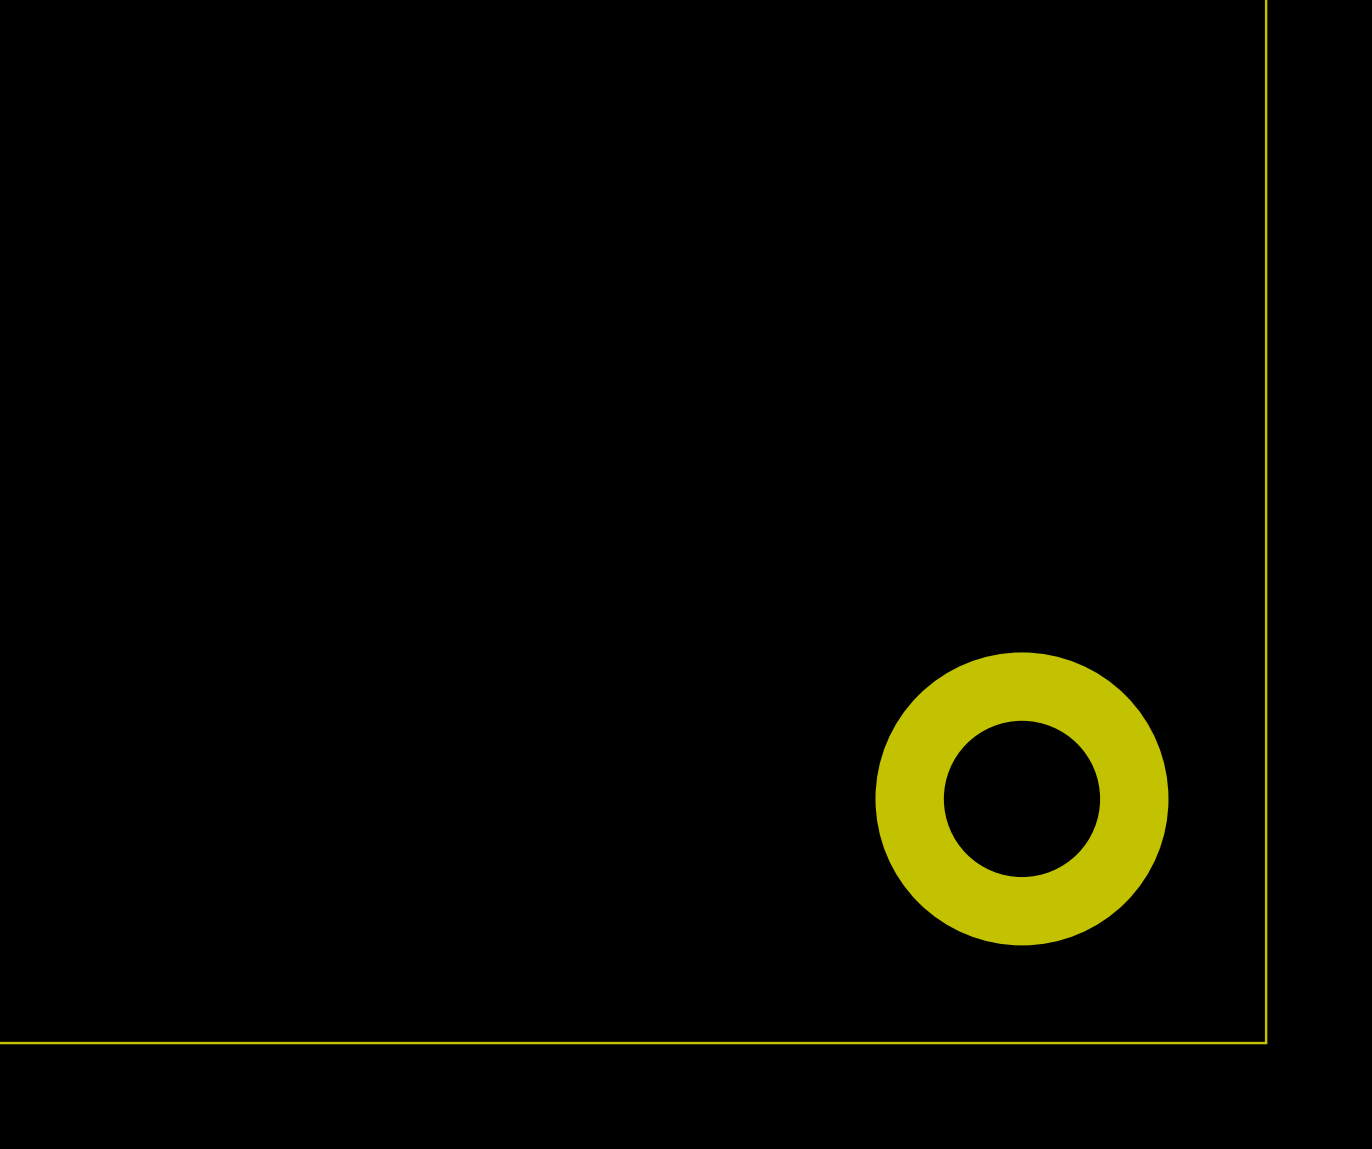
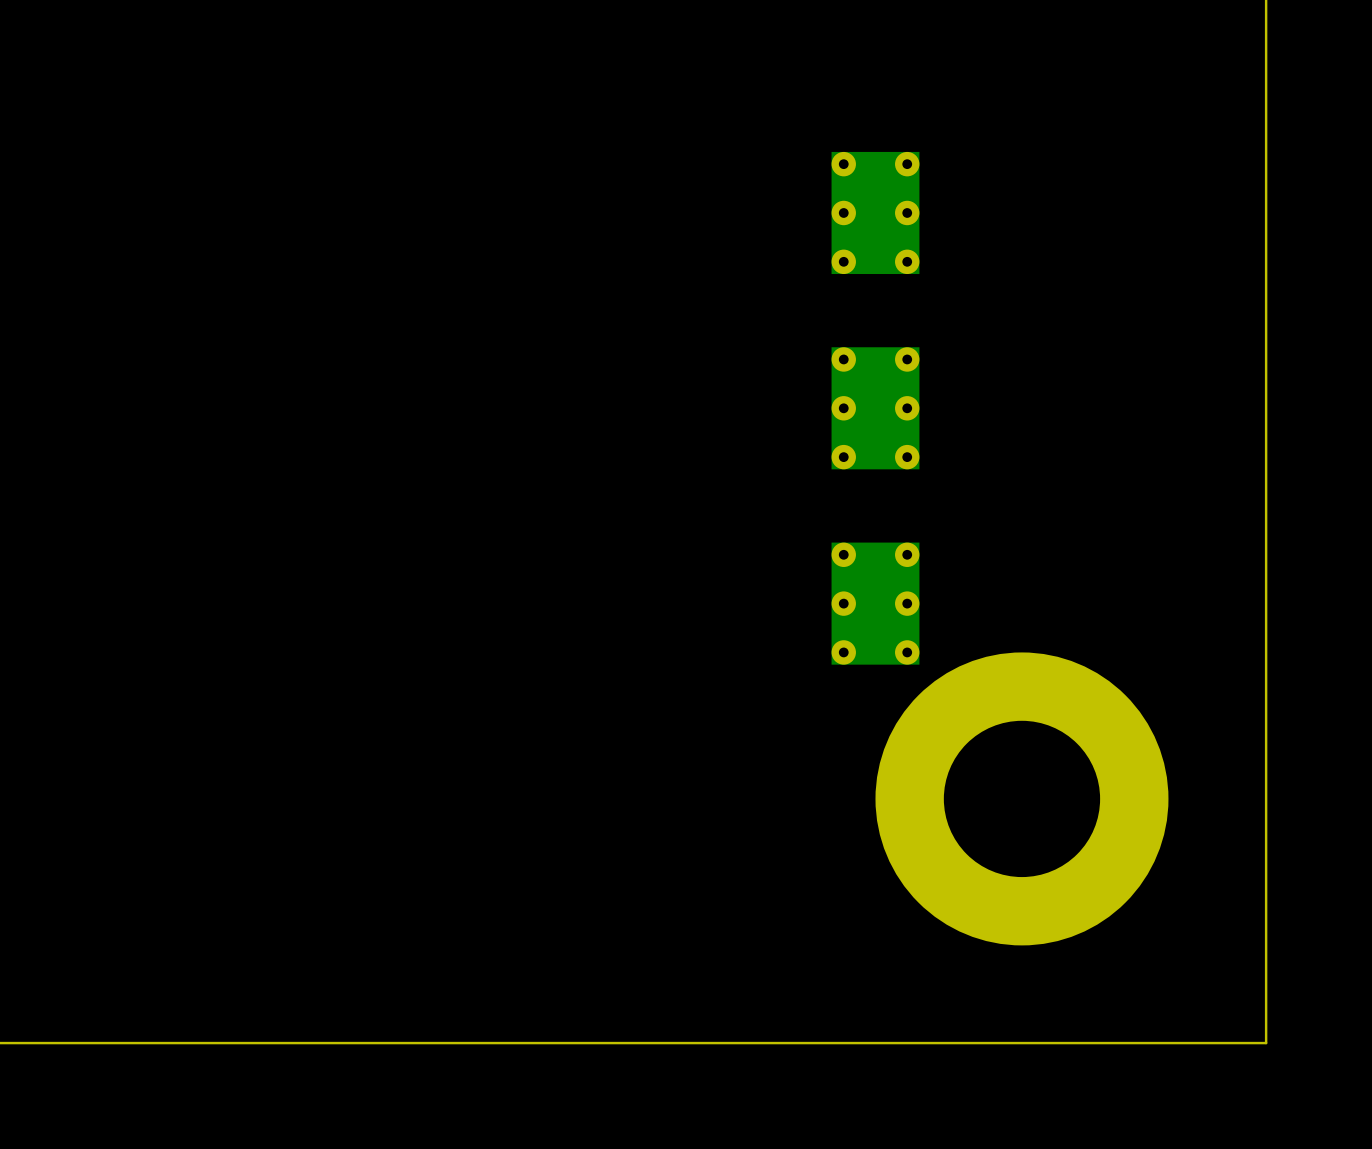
part: none -> (875, 212)
part: none -> (875, 408)
part: none -> (875, 603)

